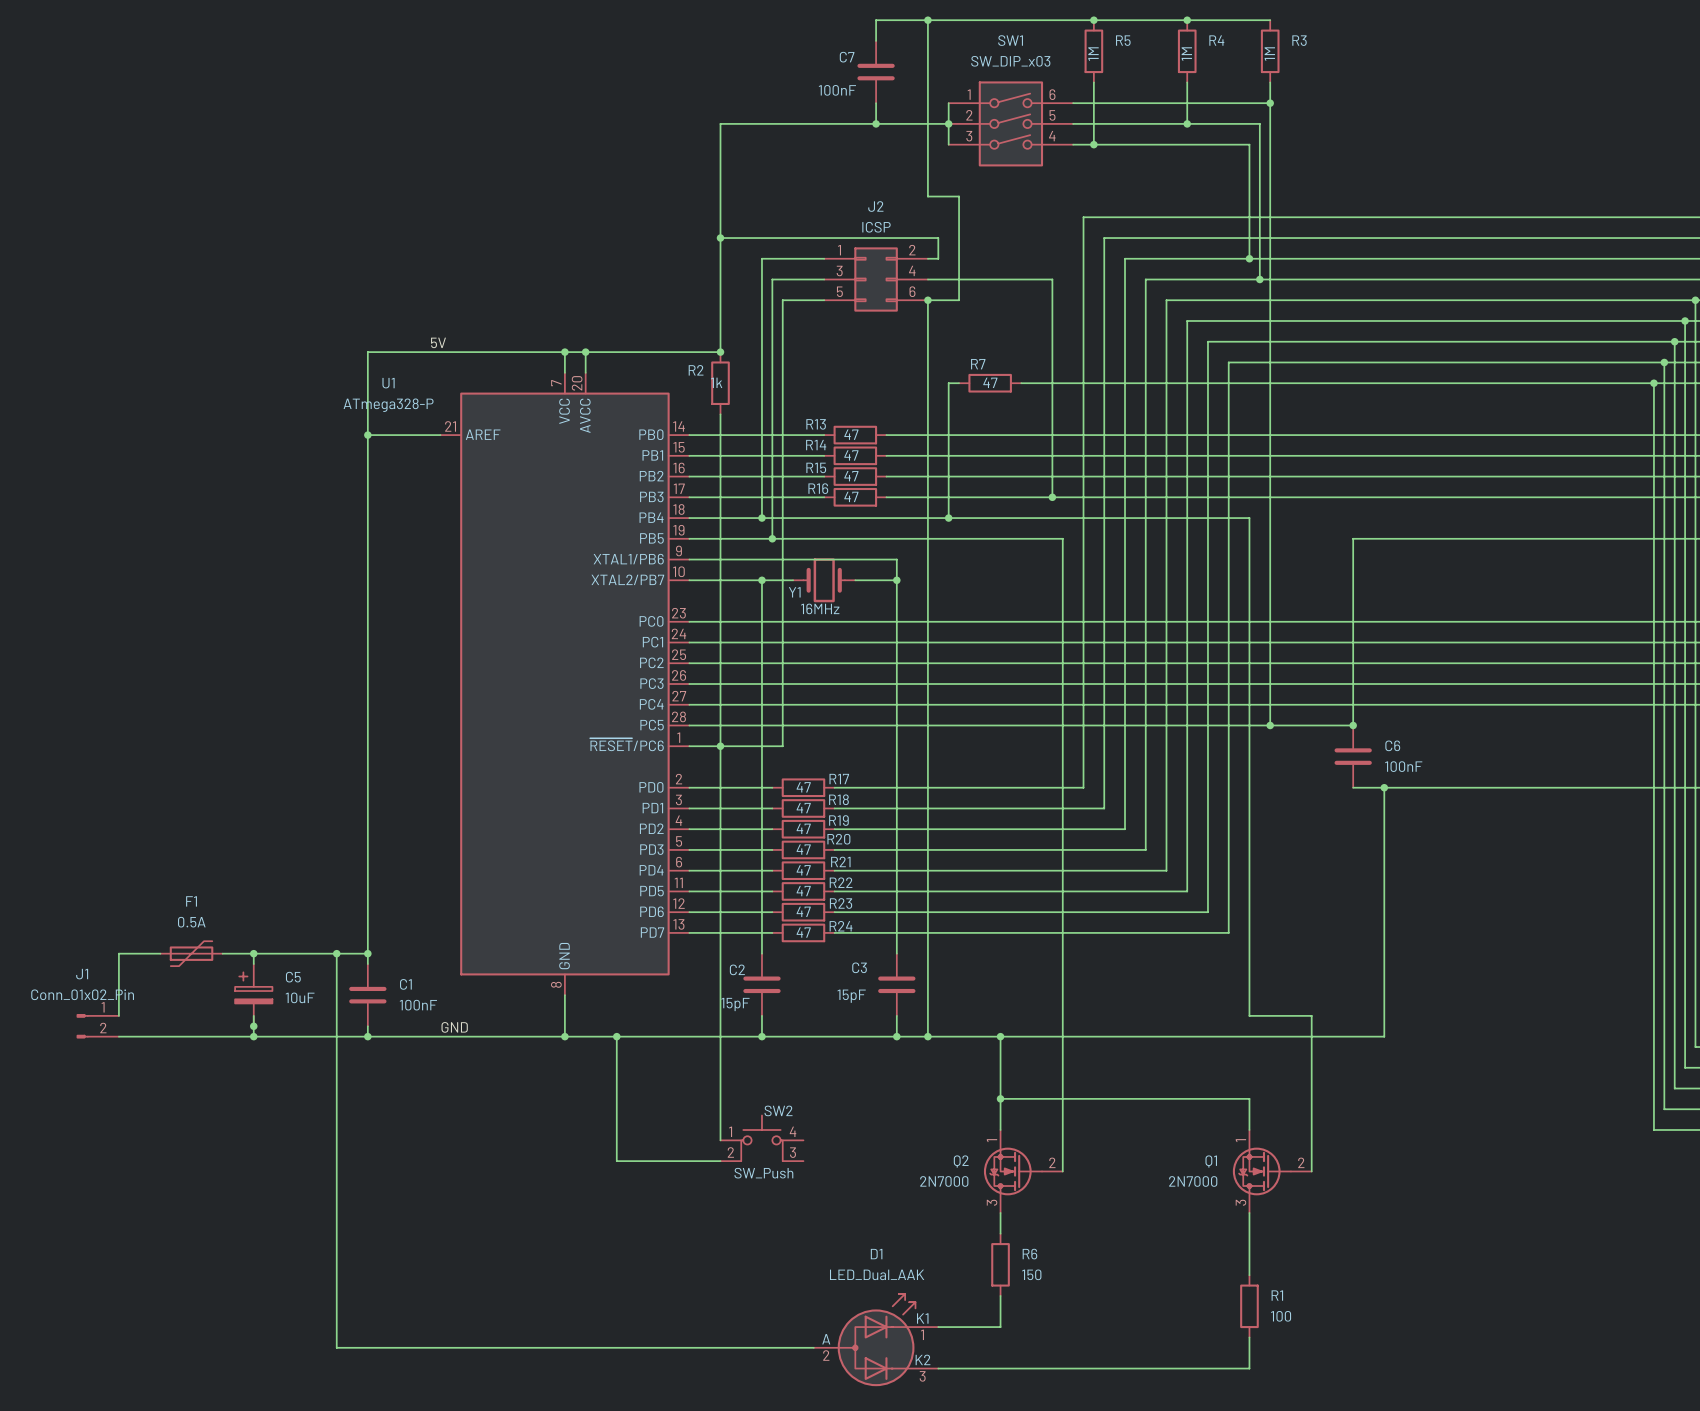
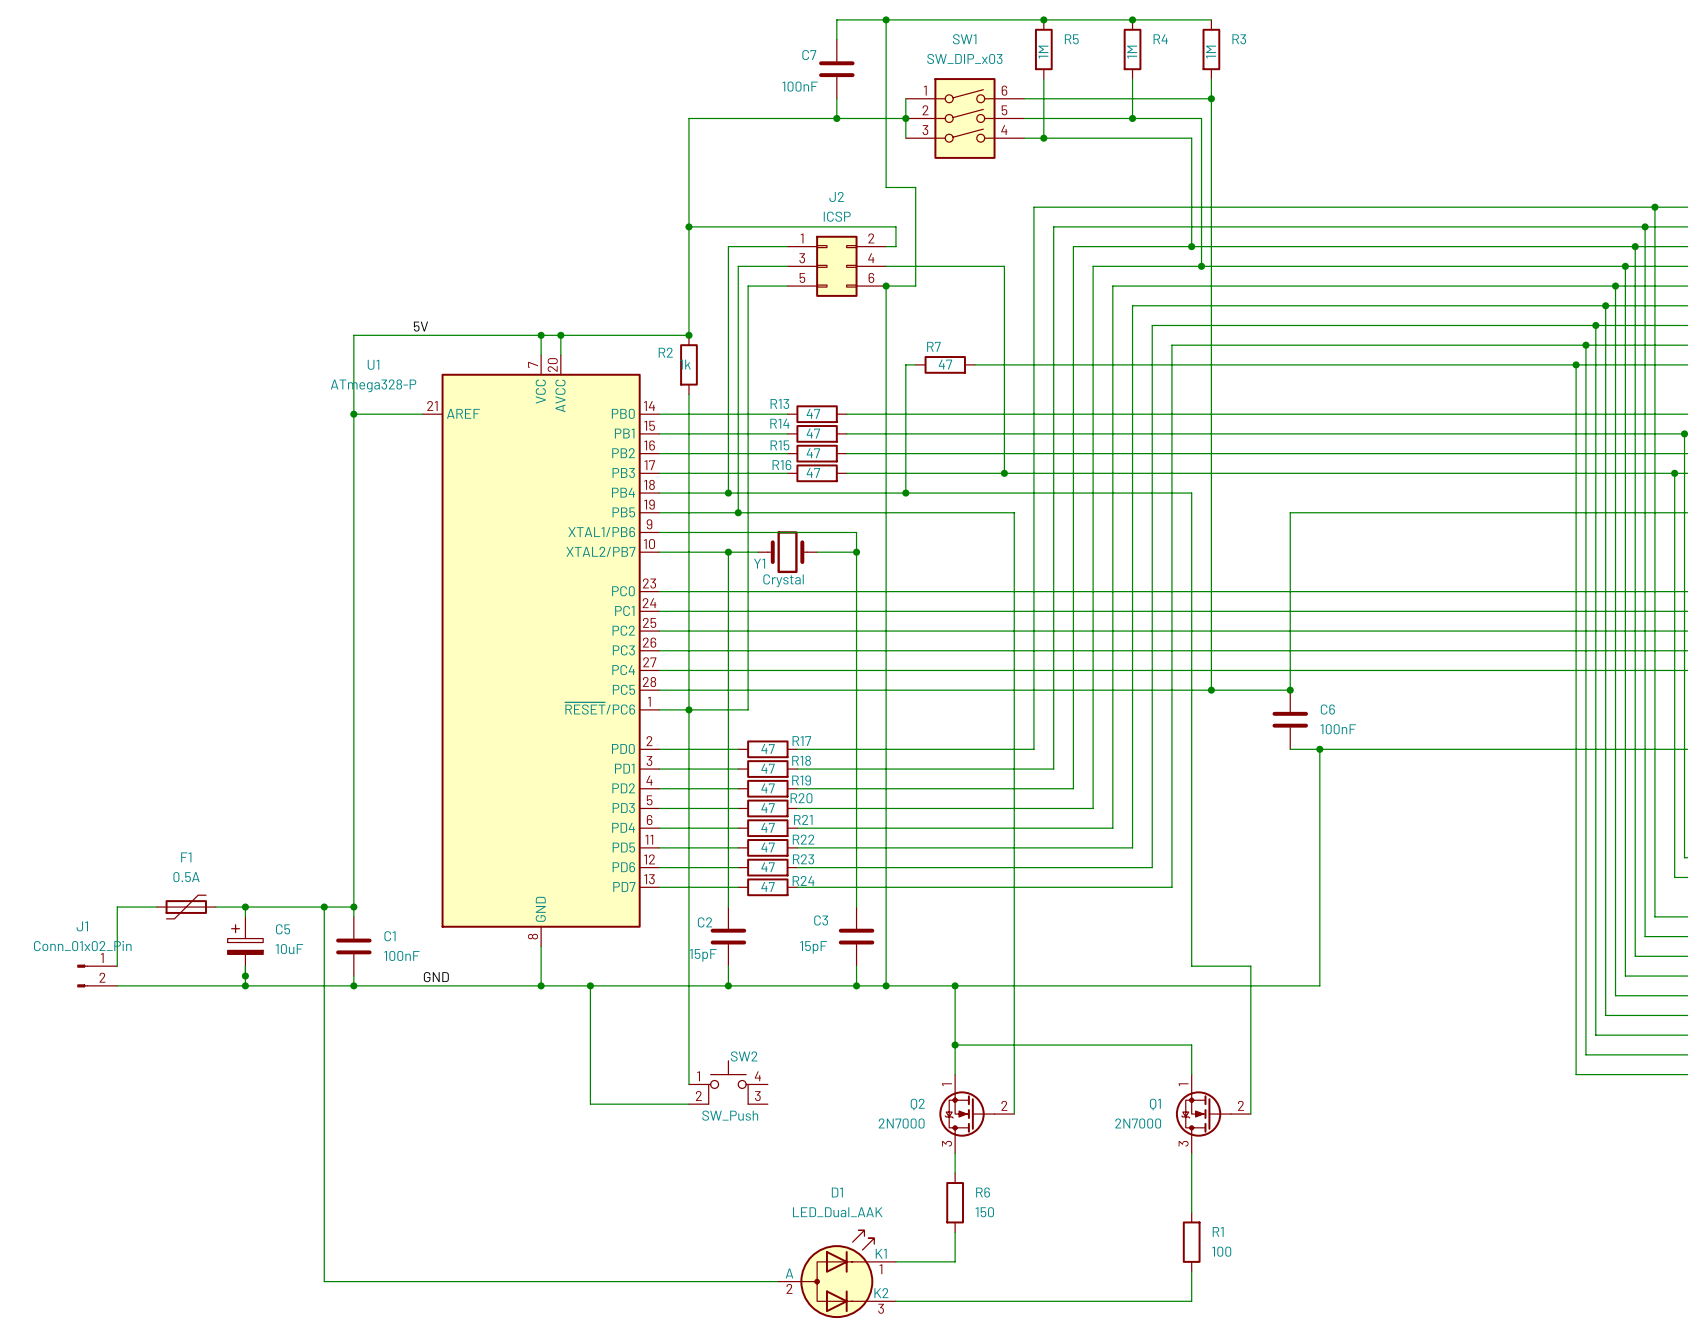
Y1 value: 16MHz (820, 608) -> Crystal (783, 580)

